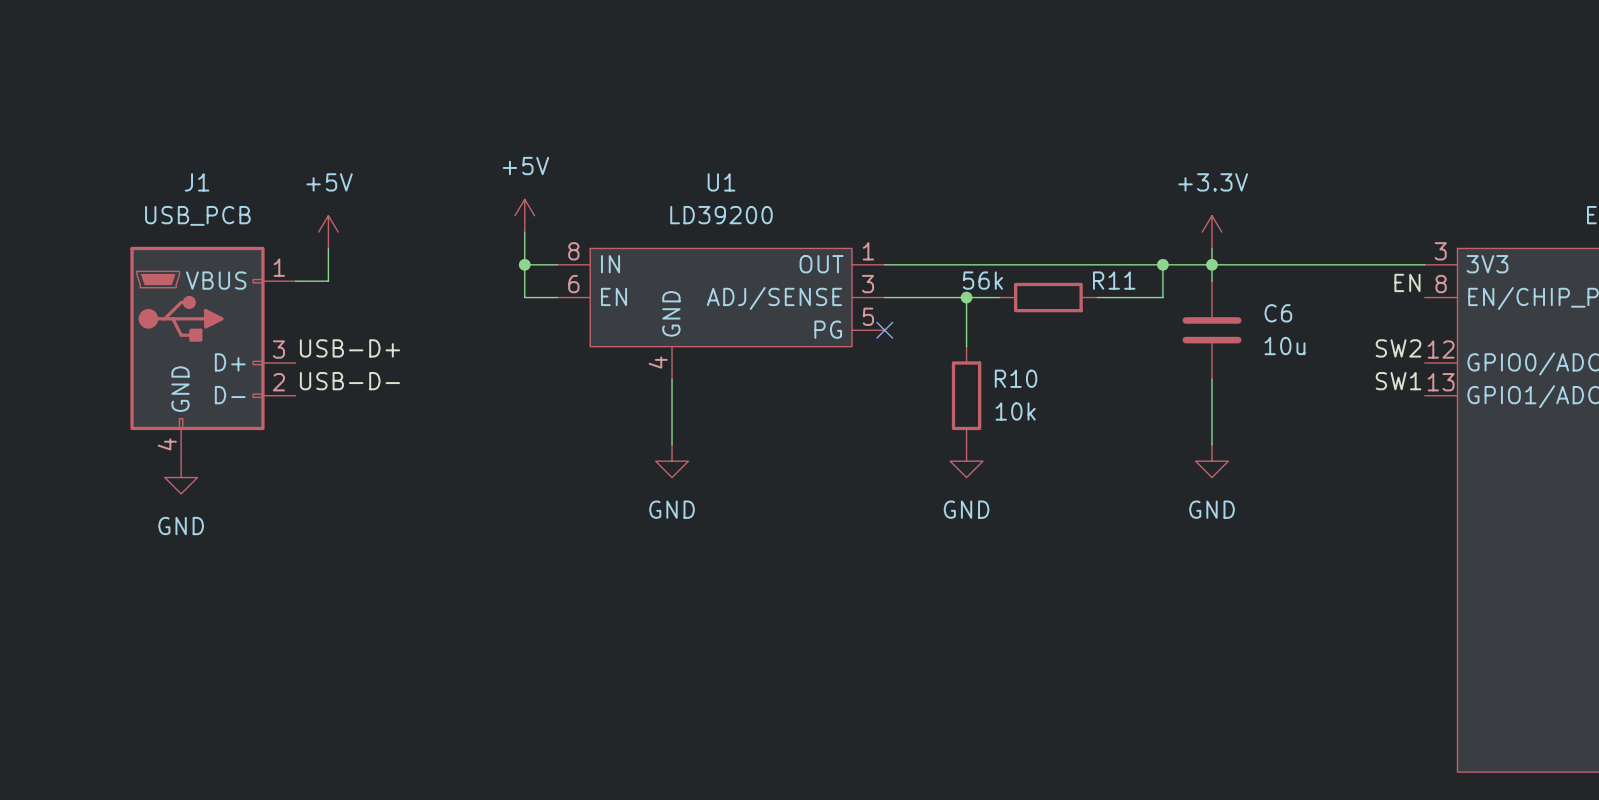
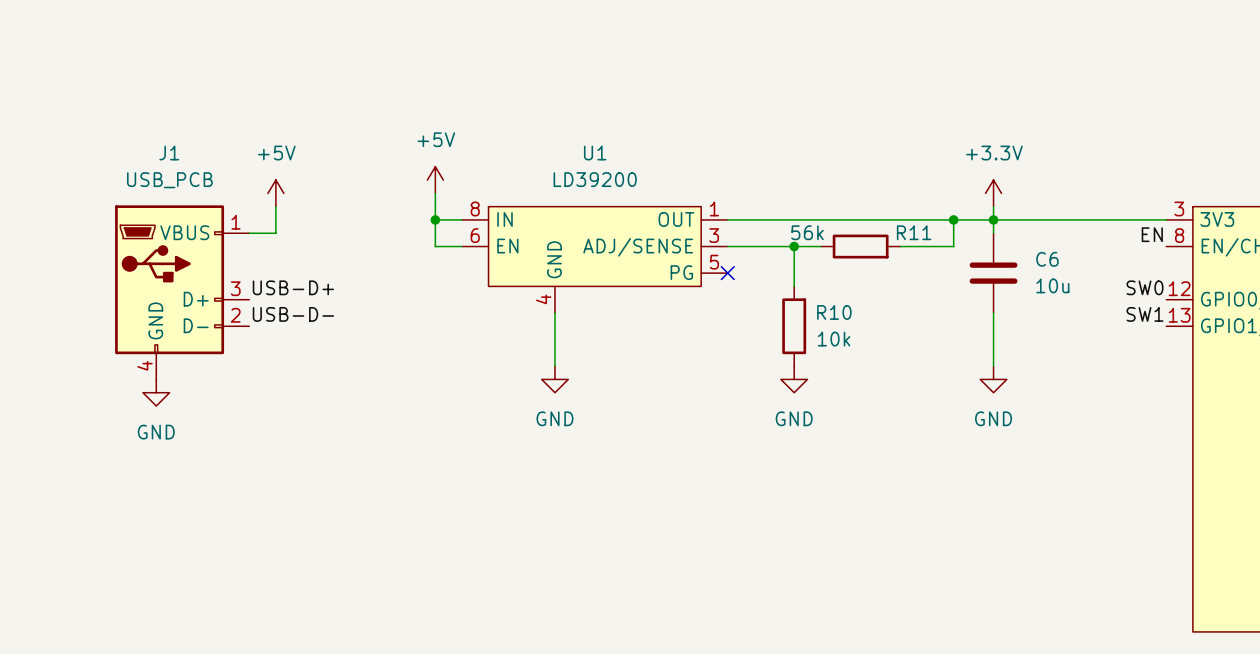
label: SW2 (1398, 348) -> SW0 (1145, 287)

